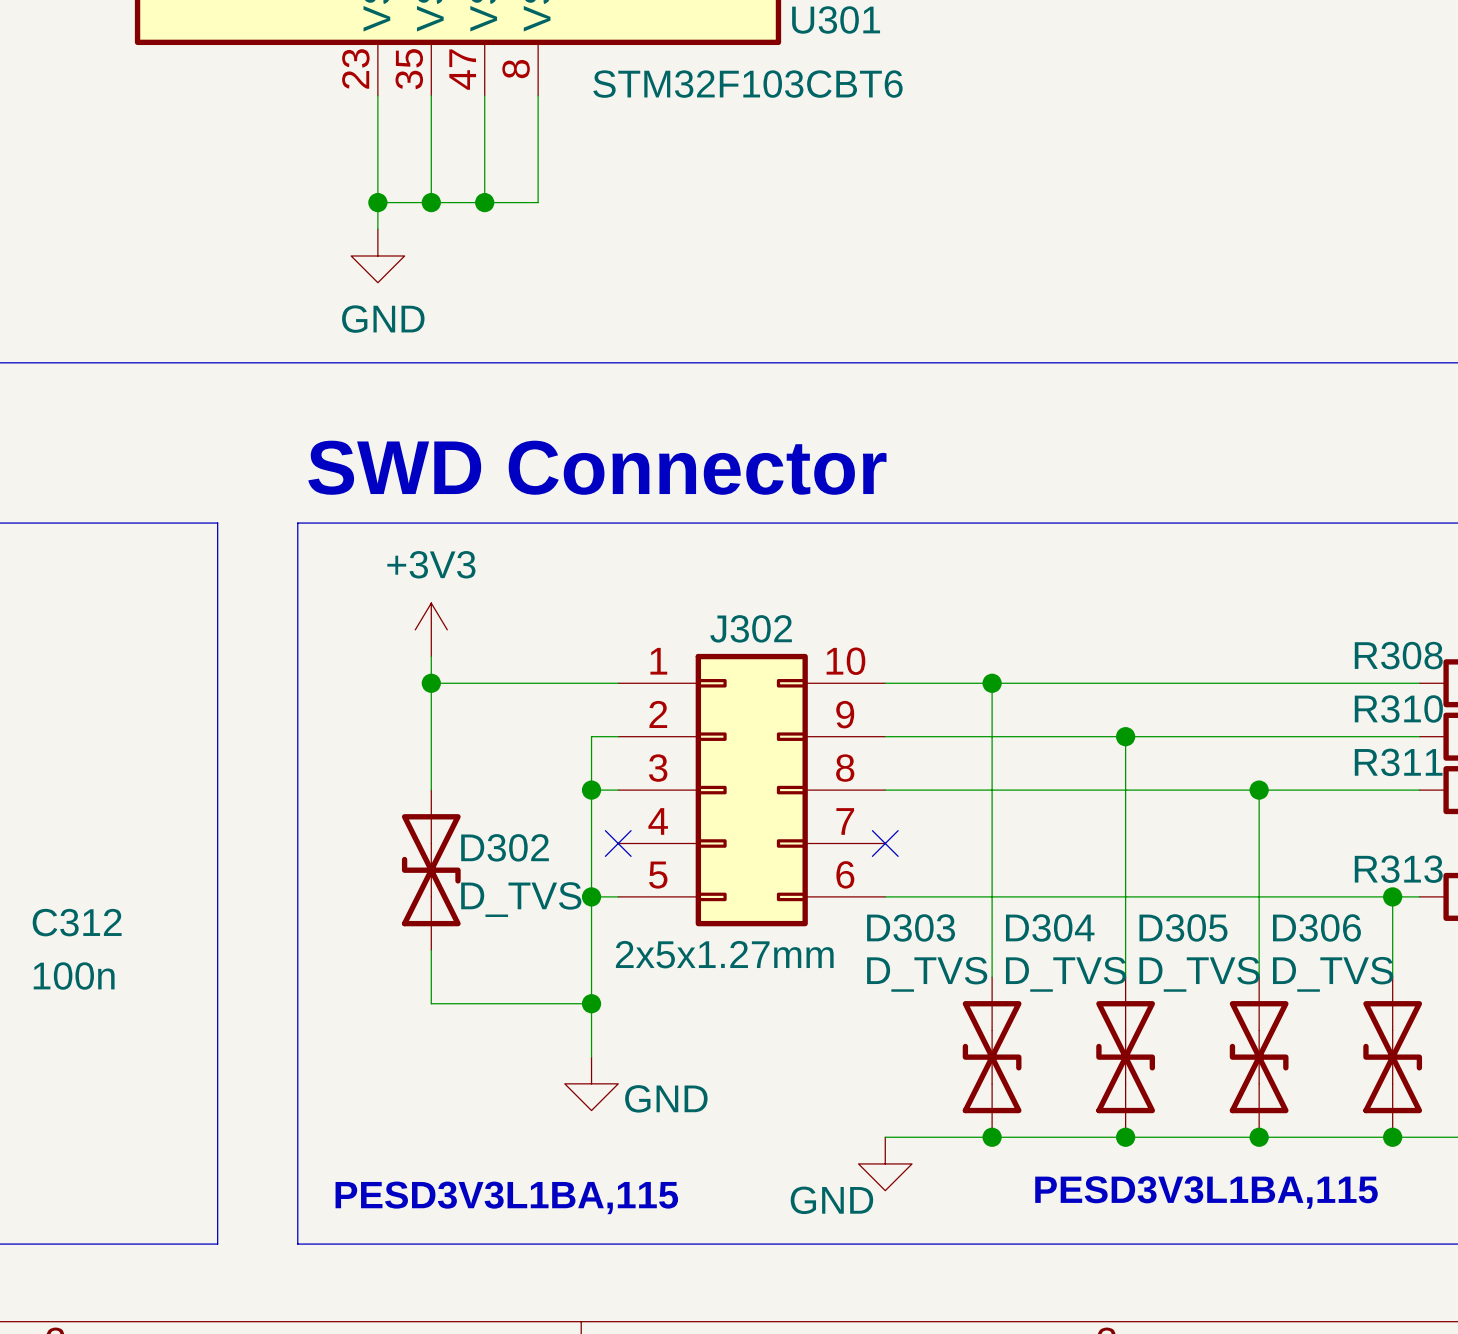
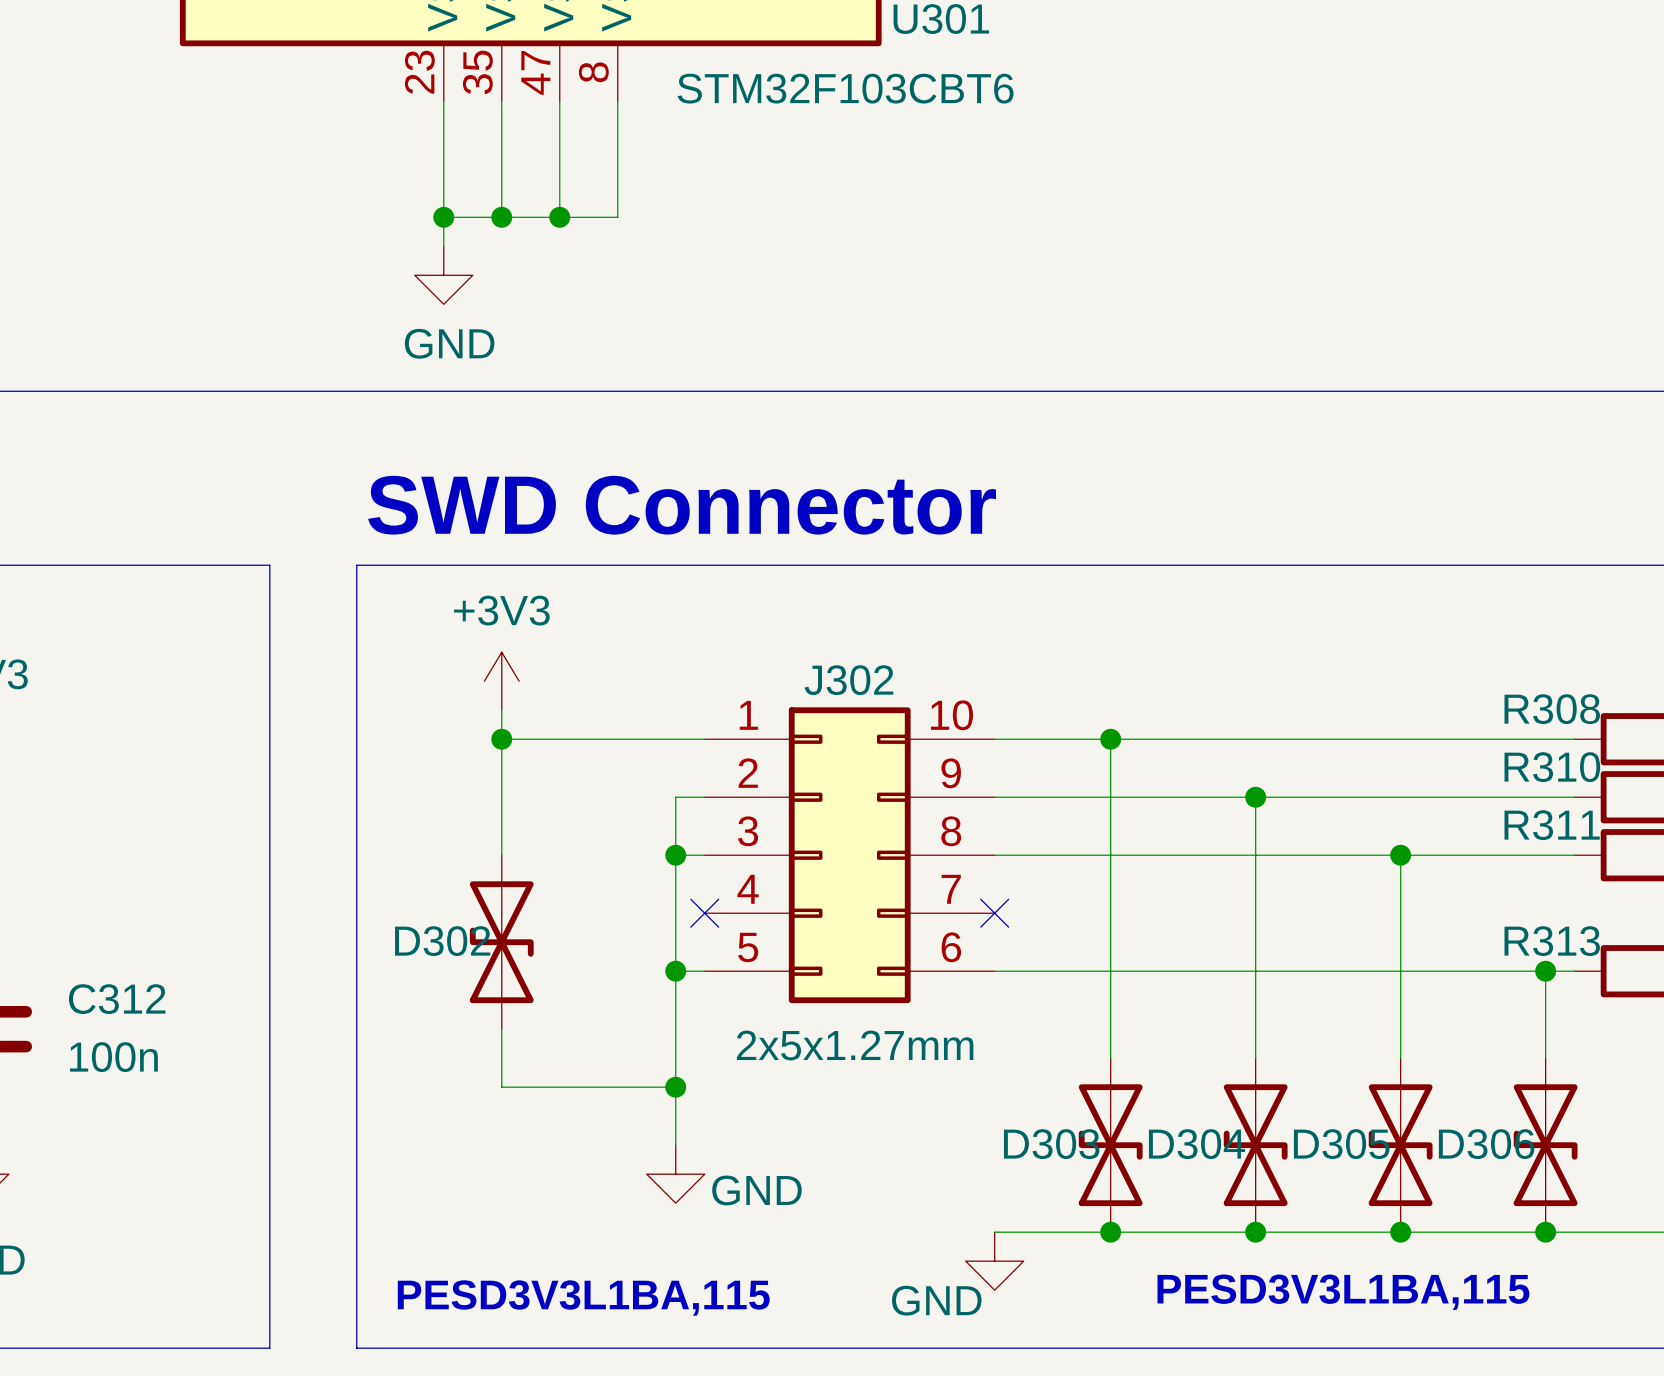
D302 name position: D302 (505, 847) -> D302 (442, 941)
D302 value: D_TVS (521, 899) -> none
D303 name position: D303 (911, 927) -> D303 (1051, 1144)
D304 name position: D304 (1050, 927) -> D304 (1196, 1144)
D305 name position: D305 (1183, 927) -> D305 (1341, 1144)
D306 name position: D306 (1316, 927) -> D306 (1486, 1144)
J302 value position: 2x5x1.27mm (724, 954) -> 2x5x1.27mm (855, 1045)
D303 value: D_TVS (927, 974) -> none
D304 value: D_TVS (1066, 974) -> none
D305 value: D_TVS (1199, 974) -> none
D306 value: D_TVS (1333, 974) -> none

